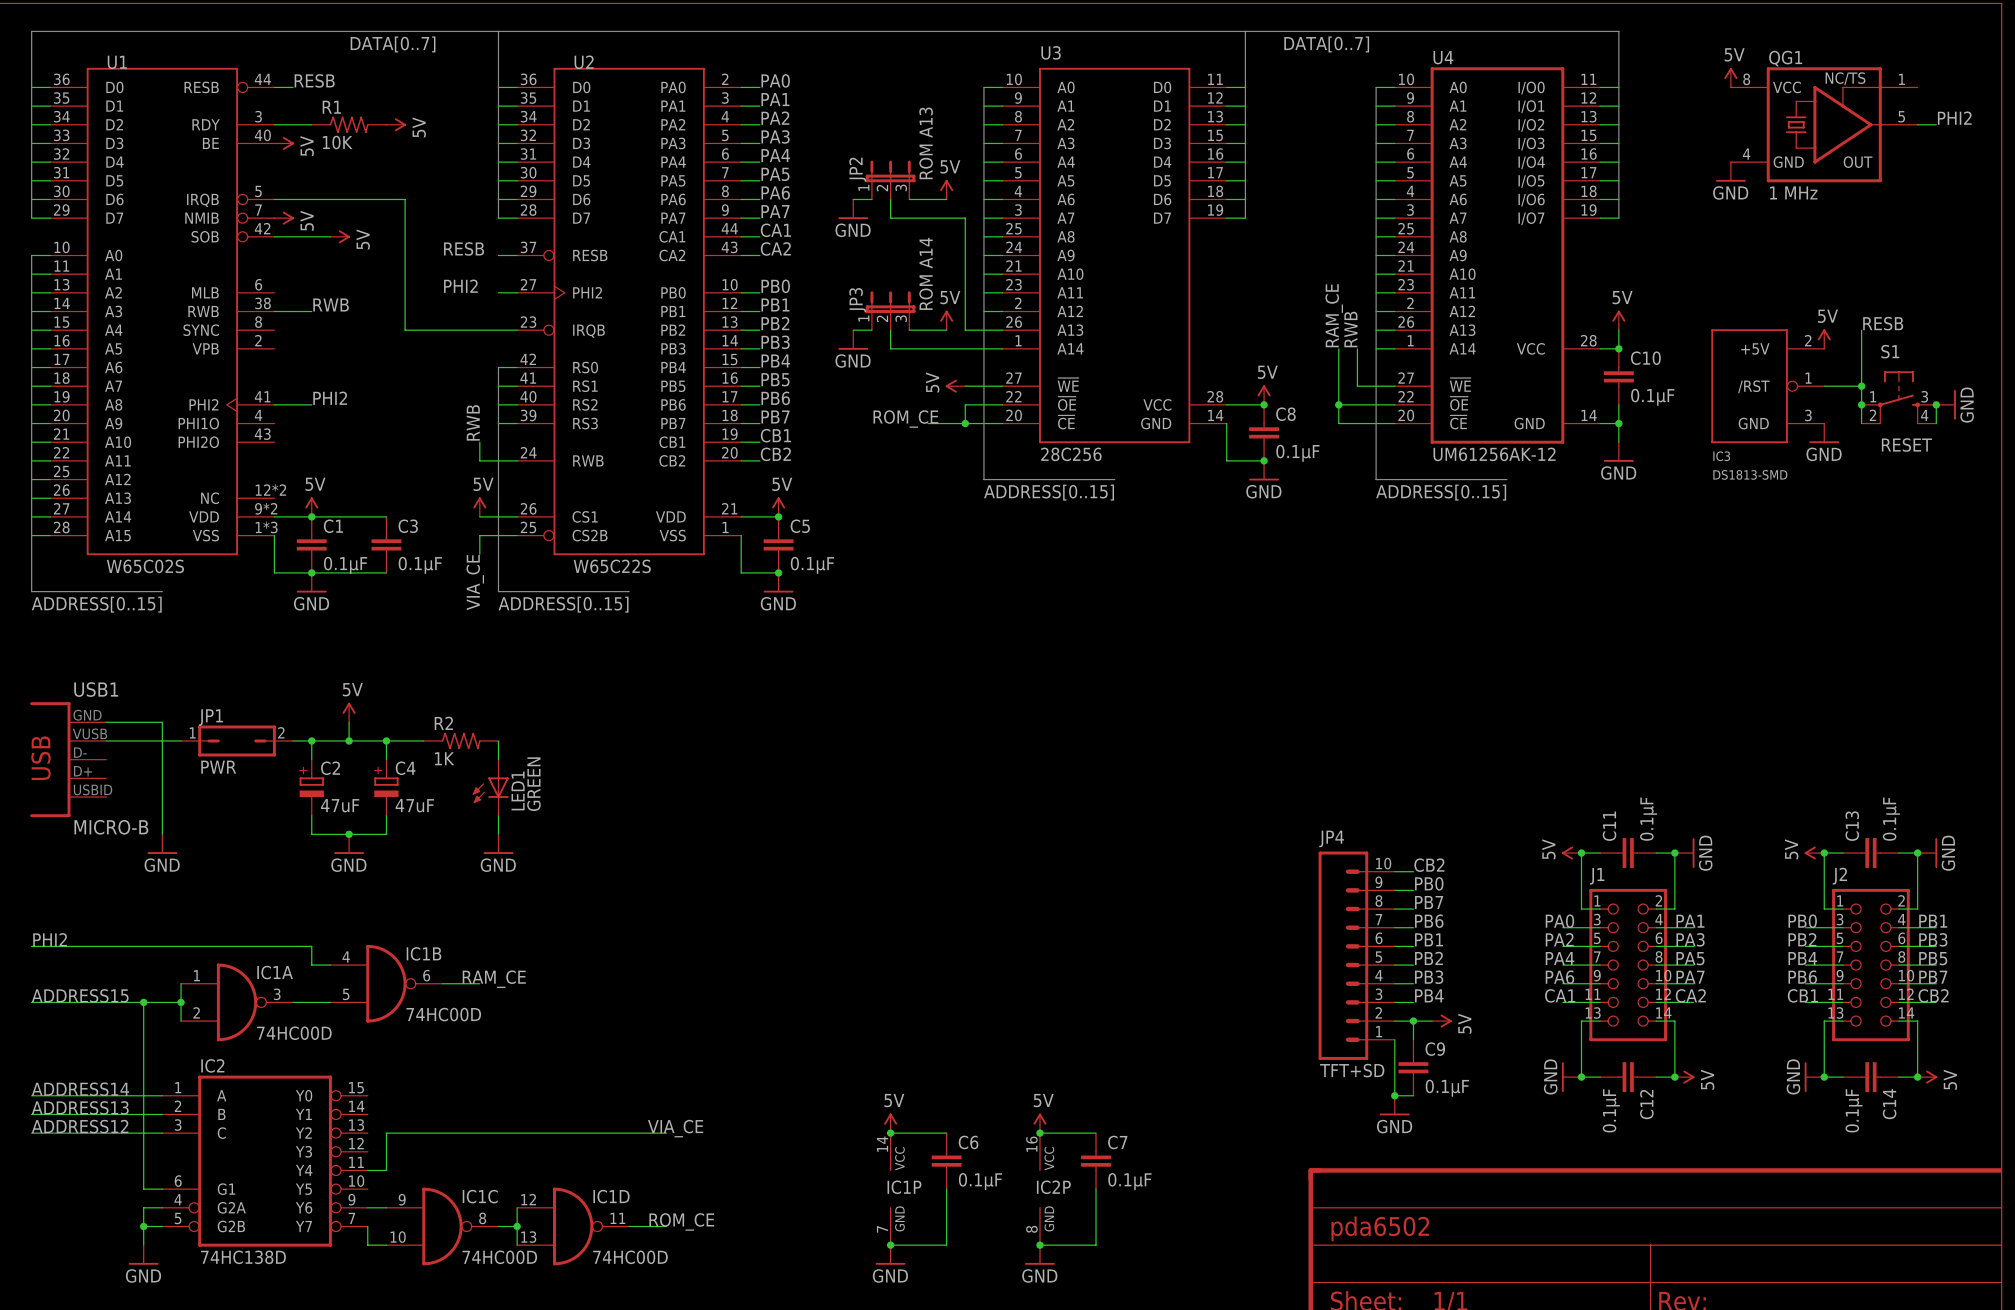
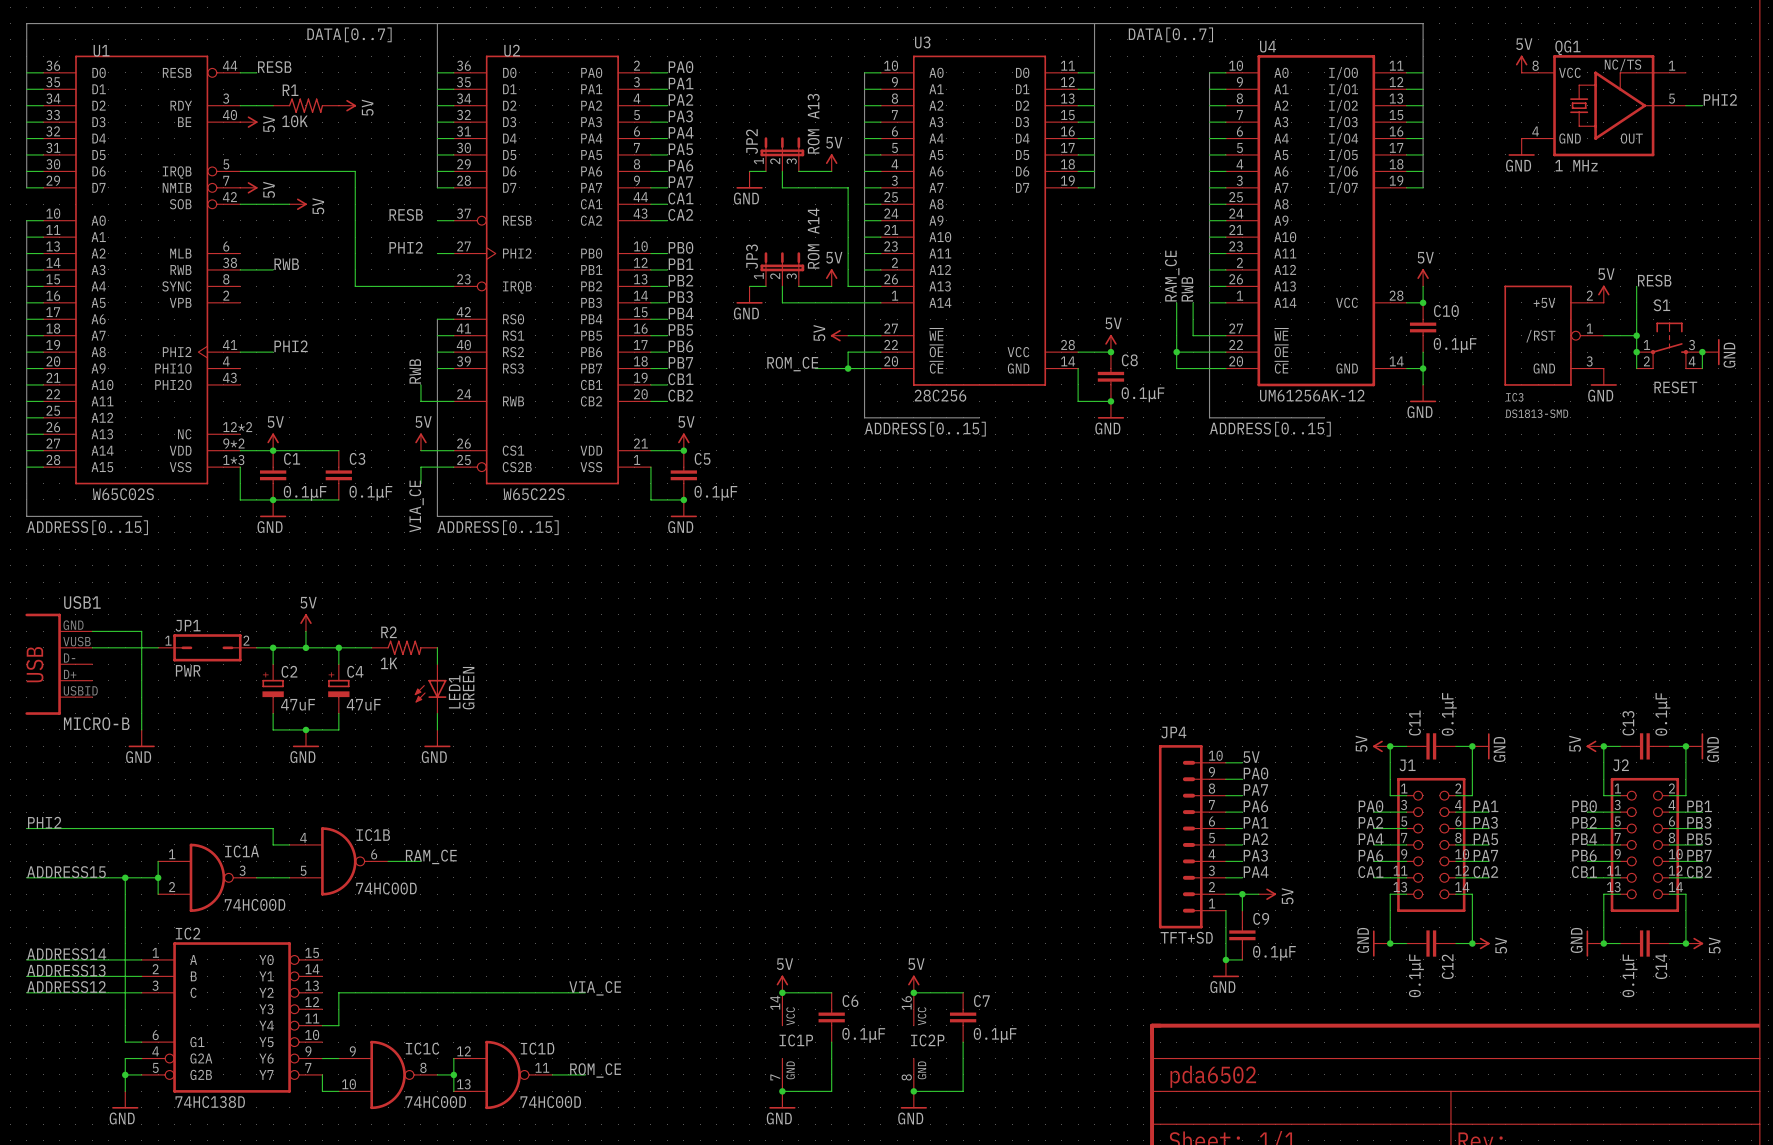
label: CB2 (1429, 865) -> 5V (1251, 757)
label: PB0 (1429, 883) -> PA0 (1255, 773)
label: PB7 (1429, 902) -> PA7 (1255, 789)
label: PB6 (1429, 921) -> PA6 (1255, 806)
label: PB1 (1429, 939) -> PA1 (1256, 822)
label: PB2 (1428, 958) -> PA2 (1255, 839)
label: PB3 (1429, 977) -> PA3 (1255, 855)
label: PB4 (1429, 995) -> PA4 (1256, 872)

